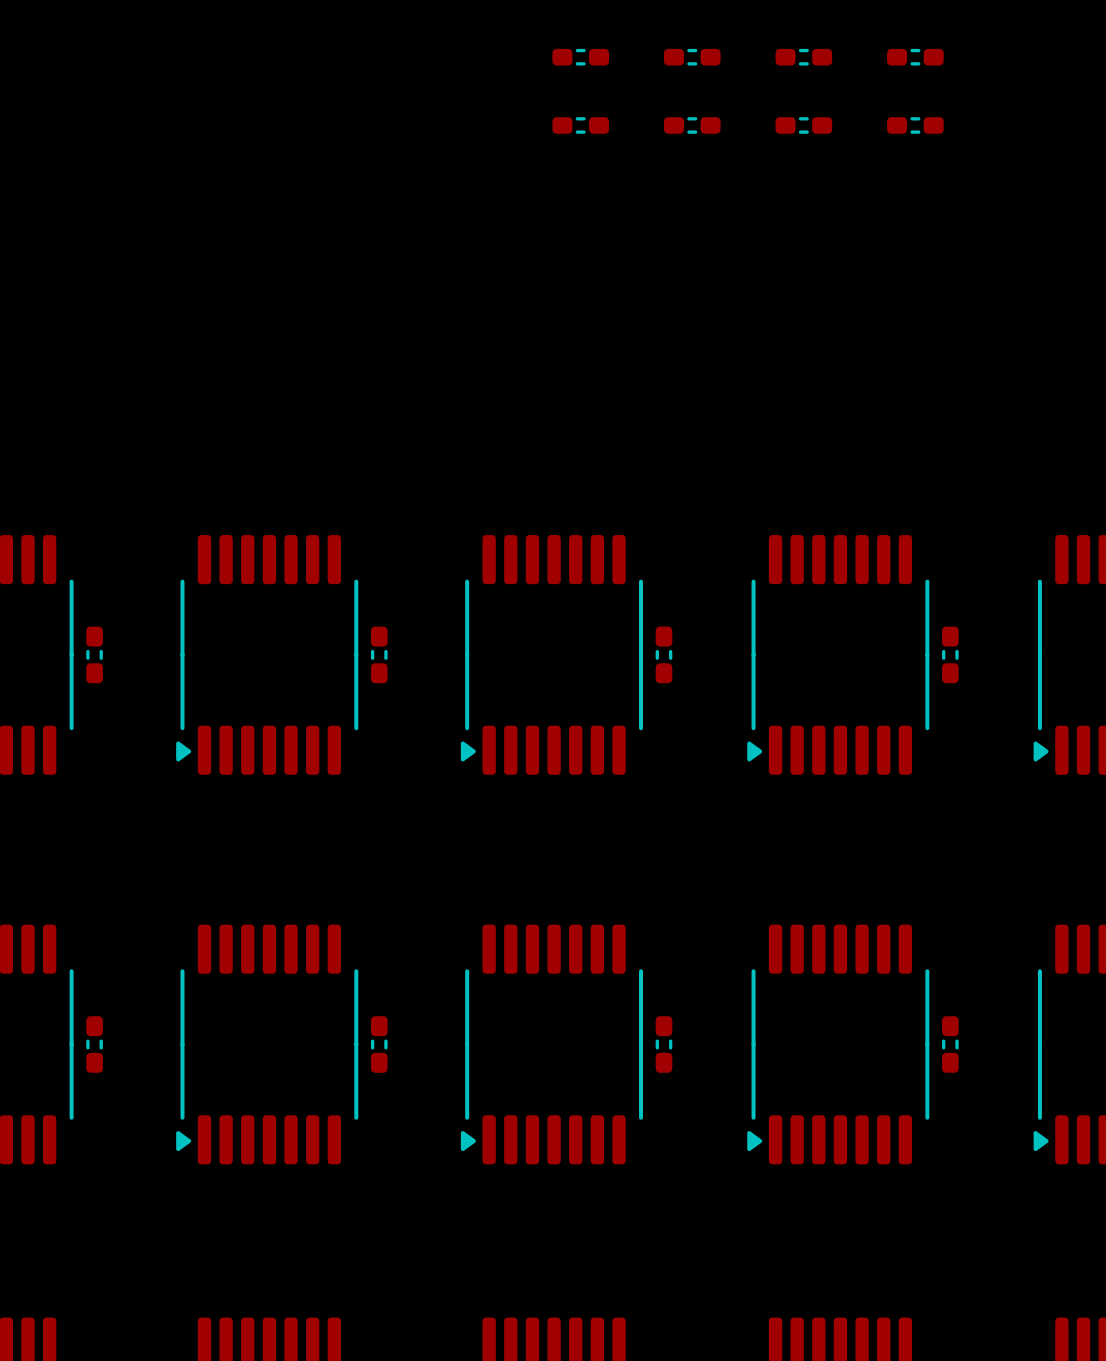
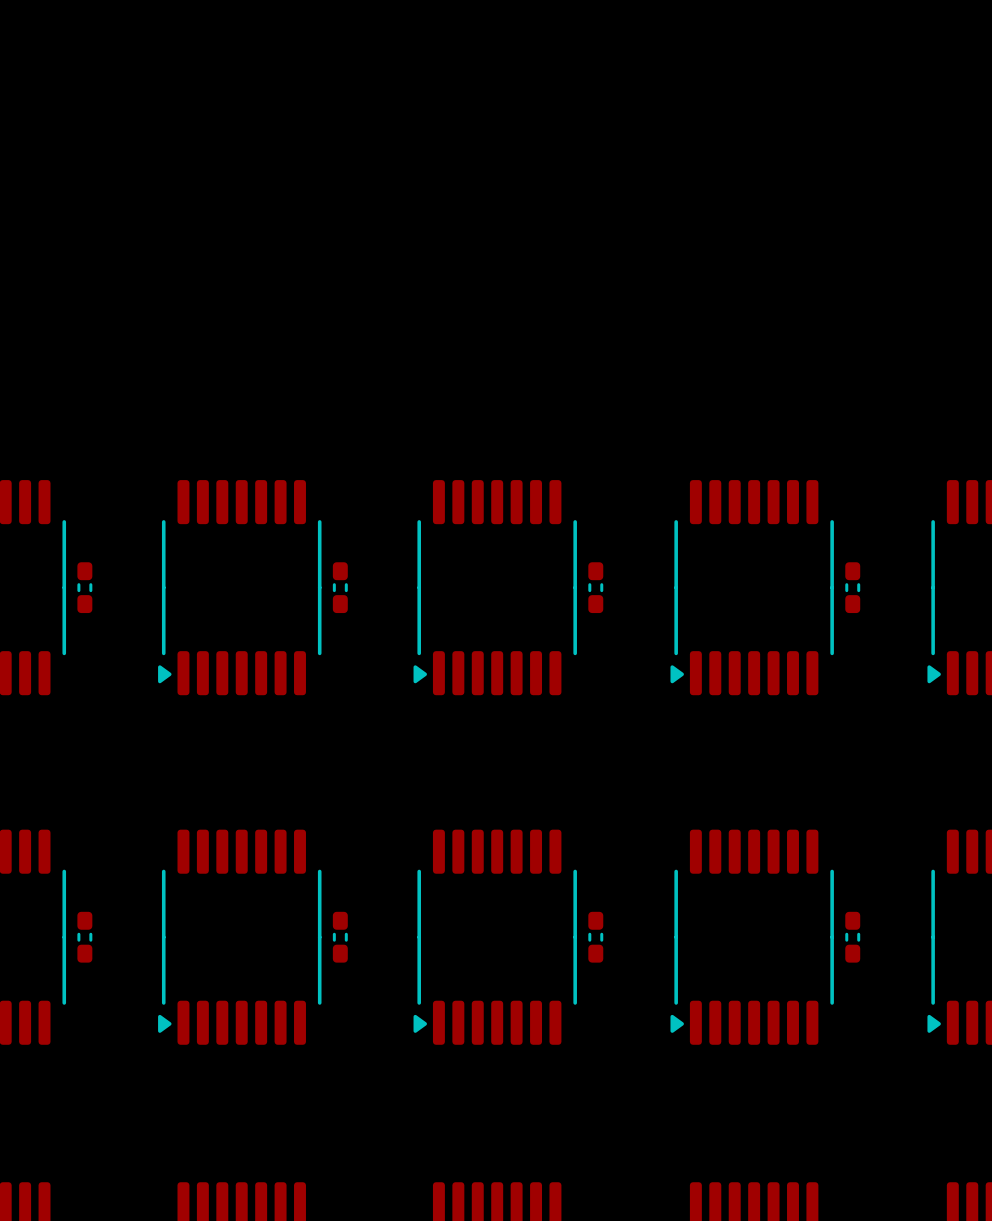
part: (580, 57) -> none
part: (692, 57) -> none
part: (803, 57) -> none
part: (915, 57) -> none
part: (580, 125) -> none
part: (692, 125) -> none
part: (803, 125) -> none
part: (915, 125) -> none

